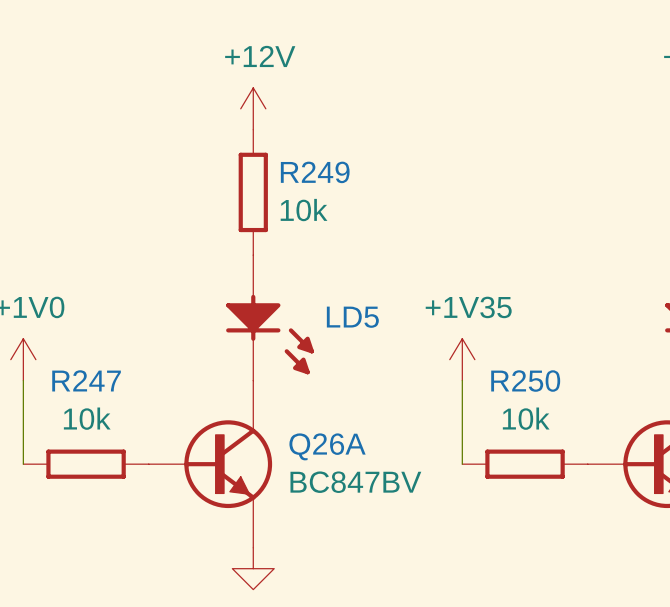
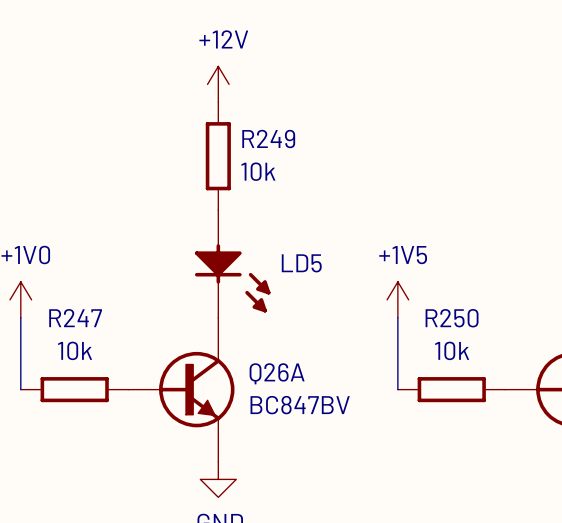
power symbol: +1V35 (462, 359) -> +1V5 (397, 299)

